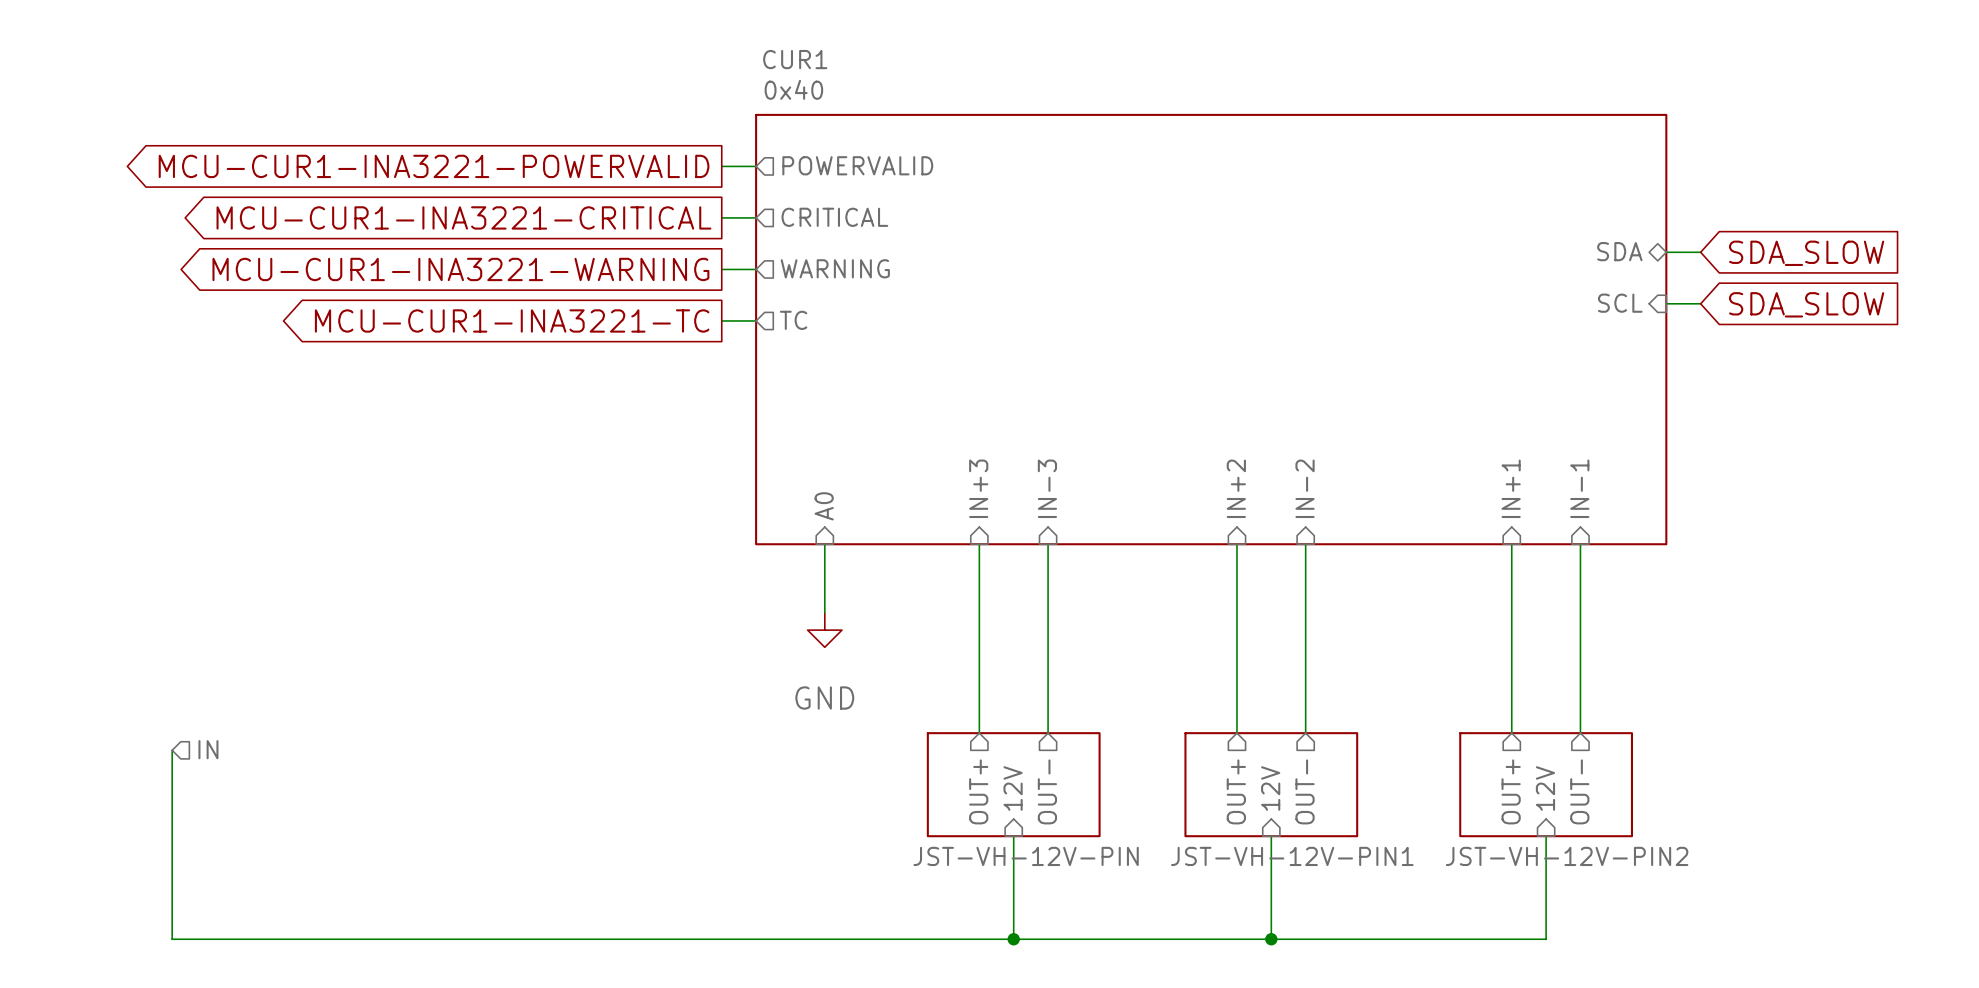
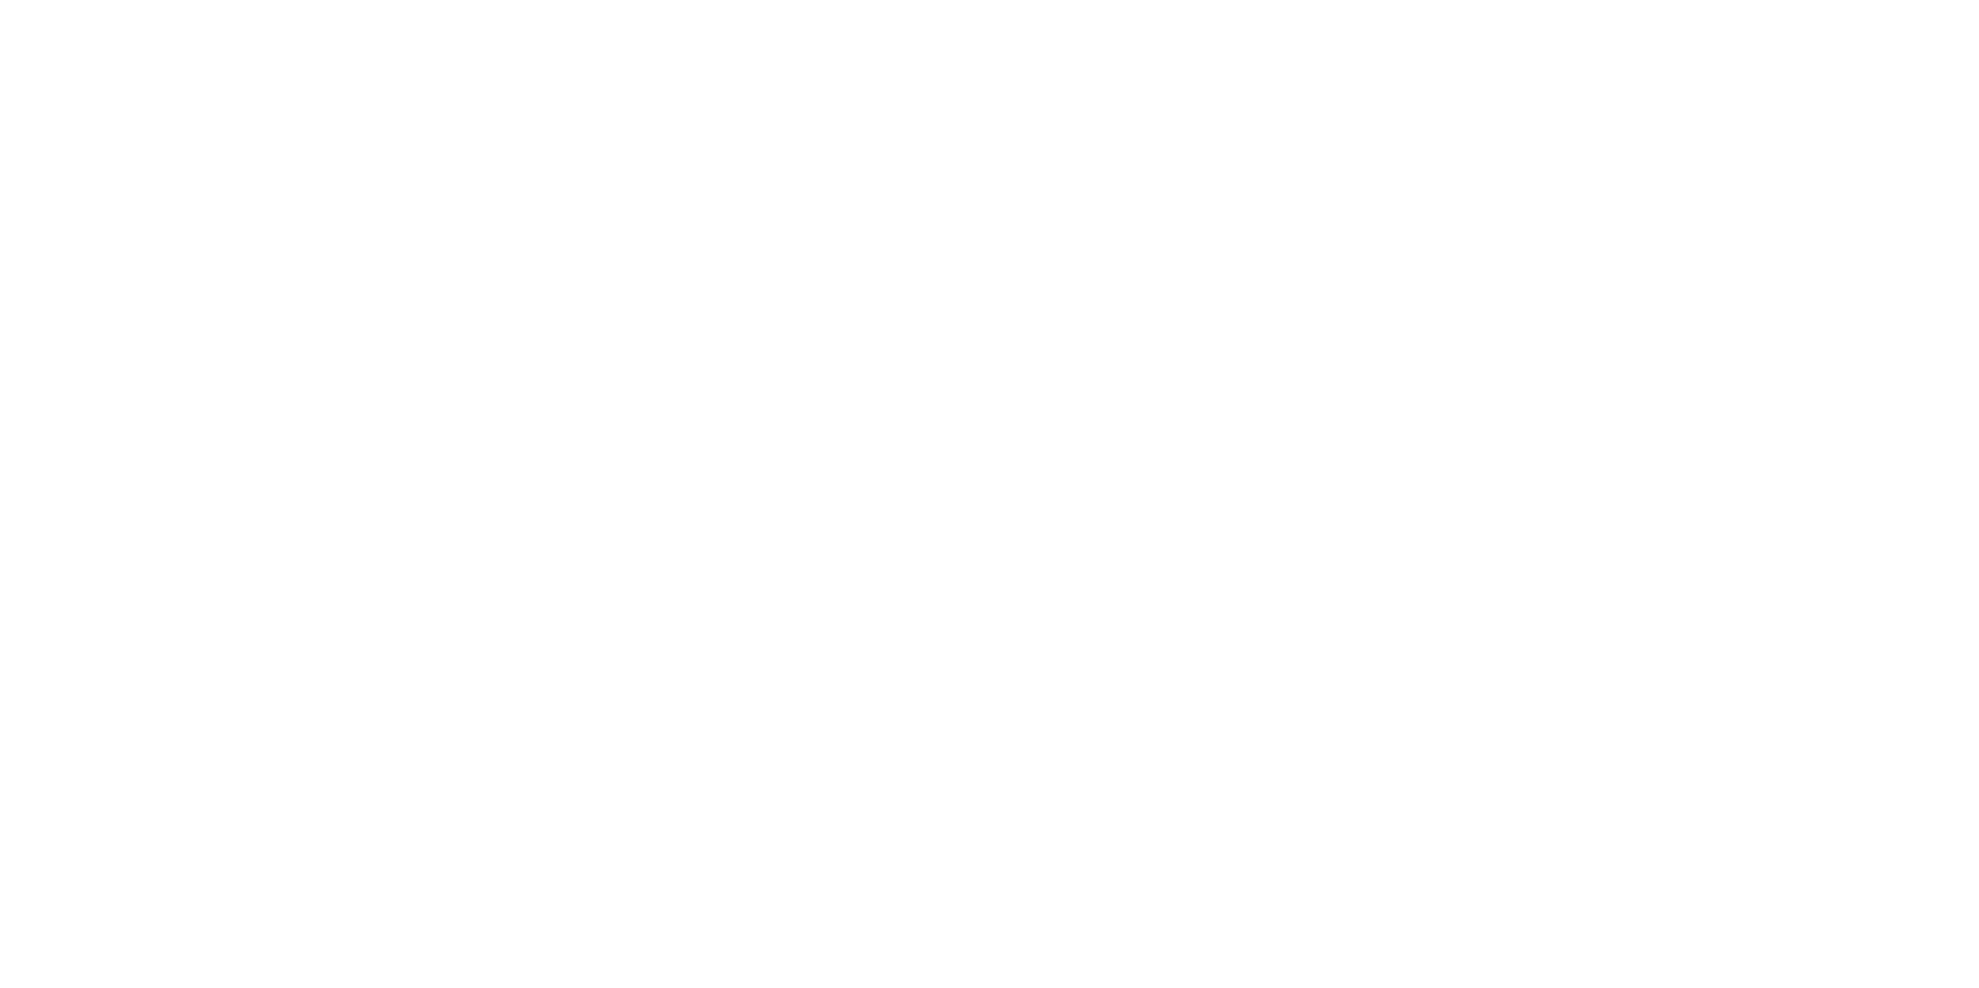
sheet pin: POWERVALID (857, 165) -> none
global label: MCU-CUR1-INA3221-POWERVALID (434, 166) -> none
wire: (721, 166) (756, 166) -> none
global label: MCU-CUR1-INA3221-CRITICAL (463, 217) -> none
wire: (721, 217) (756, 217) -> none
sheet pin: CRITICAL (834, 217) -> none
sheet pin: SDA (1619, 251) -> none
wire: (1666, 252) (1700, 252) -> none
global label: SDA_SLOW (1806, 253) -> none
sheet pin: WARNING (835, 268) -> none
global label: MCU-CUR1-INA3221-WARNING (460, 269) -> none
wire: (721, 269) (756, 269) -> none
sheet pin: SCL (1620, 303) -> none
wire: (1666, 303) (1700, 303) -> none
global label: SDA_SLOW (1806, 304) -> none
global label: MCU-CUR1-INA3221-TC (512, 320) -> none
wire: (721, 320) (756, 320) -> none
sheet pin: TC (793, 320) -> none
sheet CUR1: (1211, 329) -> none
sheet pin: IN+3 (978, 488) -> none
sheet pin: IN-3 (1047, 488) -> none
sheet pin: IN+2 (1236, 488) -> none
sheet pin: IN-2 (1305, 488) -> none
sheet pin: IN+1 (1511, 488) -> none
sheet pin: IN-1 (1579, 488) -> none
sheet pin: A0 (824, 506) -> none
wire: (824, 544) (824, 612) -> none
wire: (979, 544) (979, 733) -> none
wire: (1048, 544) (1048, 733) -> none
wire: (1236, 544) (1236, 733) -> none
wire: (1305, 544) (1305, 733) -> none
wire: (1511, 544) (1511, 733) -> none
wire: (1580, 544) (1580, 733) -> none
power symbol: GND (824, 630) -> none
hierarchical label: IN (208, 749) -> none
wire: (172, 750) (172, 939) (1546, 939) (1546, 836) -> none
sheet JST-VH-12V-PIN: (1013, 784) -> none
sheet JST-VH-12V-PIN1: (1271, 784) -> none
sheet JST-VH-12V-PIN2: (1546, 784) -> none
sheet pin: 12V (1013, 788) -> none
sheet pin: 12V (1270, 788) -> none
sheet pin: 12V (1545, 788) -> none
sheet pin: OUT+ (978, 791) -> none
sheet pin: OUT- (1047, 791) -> none
sheet pin: OUT+ (1236, 791) -> none
sheet pin: OUT- (1305, 791) -> none
sheet pin: OUT+ (1511, 791) -> none
sheet pin: OUT- (1579, 791) -> none
wire: (1013, 836) (1013, 939) -> none
wire: (1271, 836) (1271, 939) -> none
junction: (1013, 939) -> none
junction: (1271, 939) -> none

